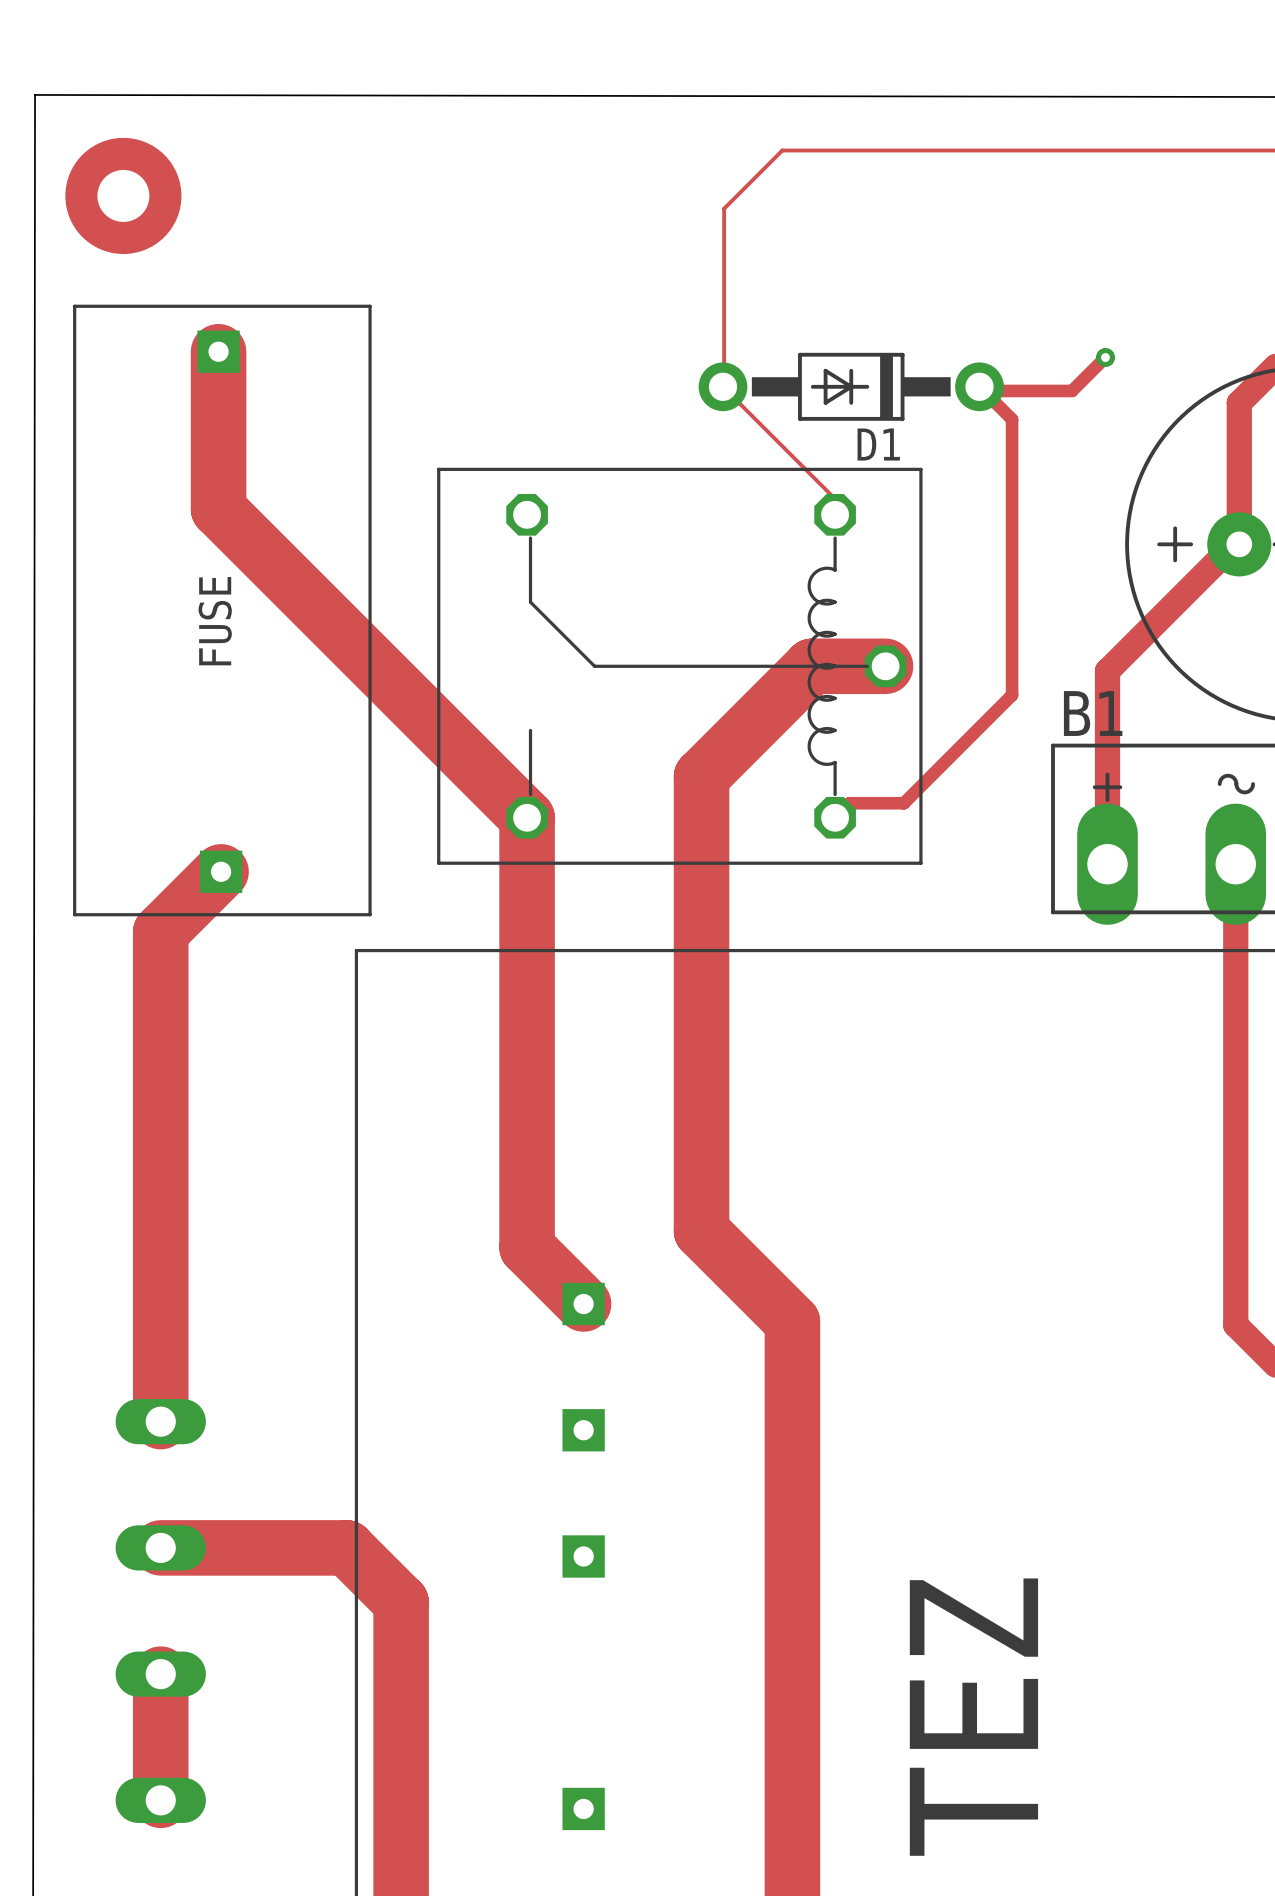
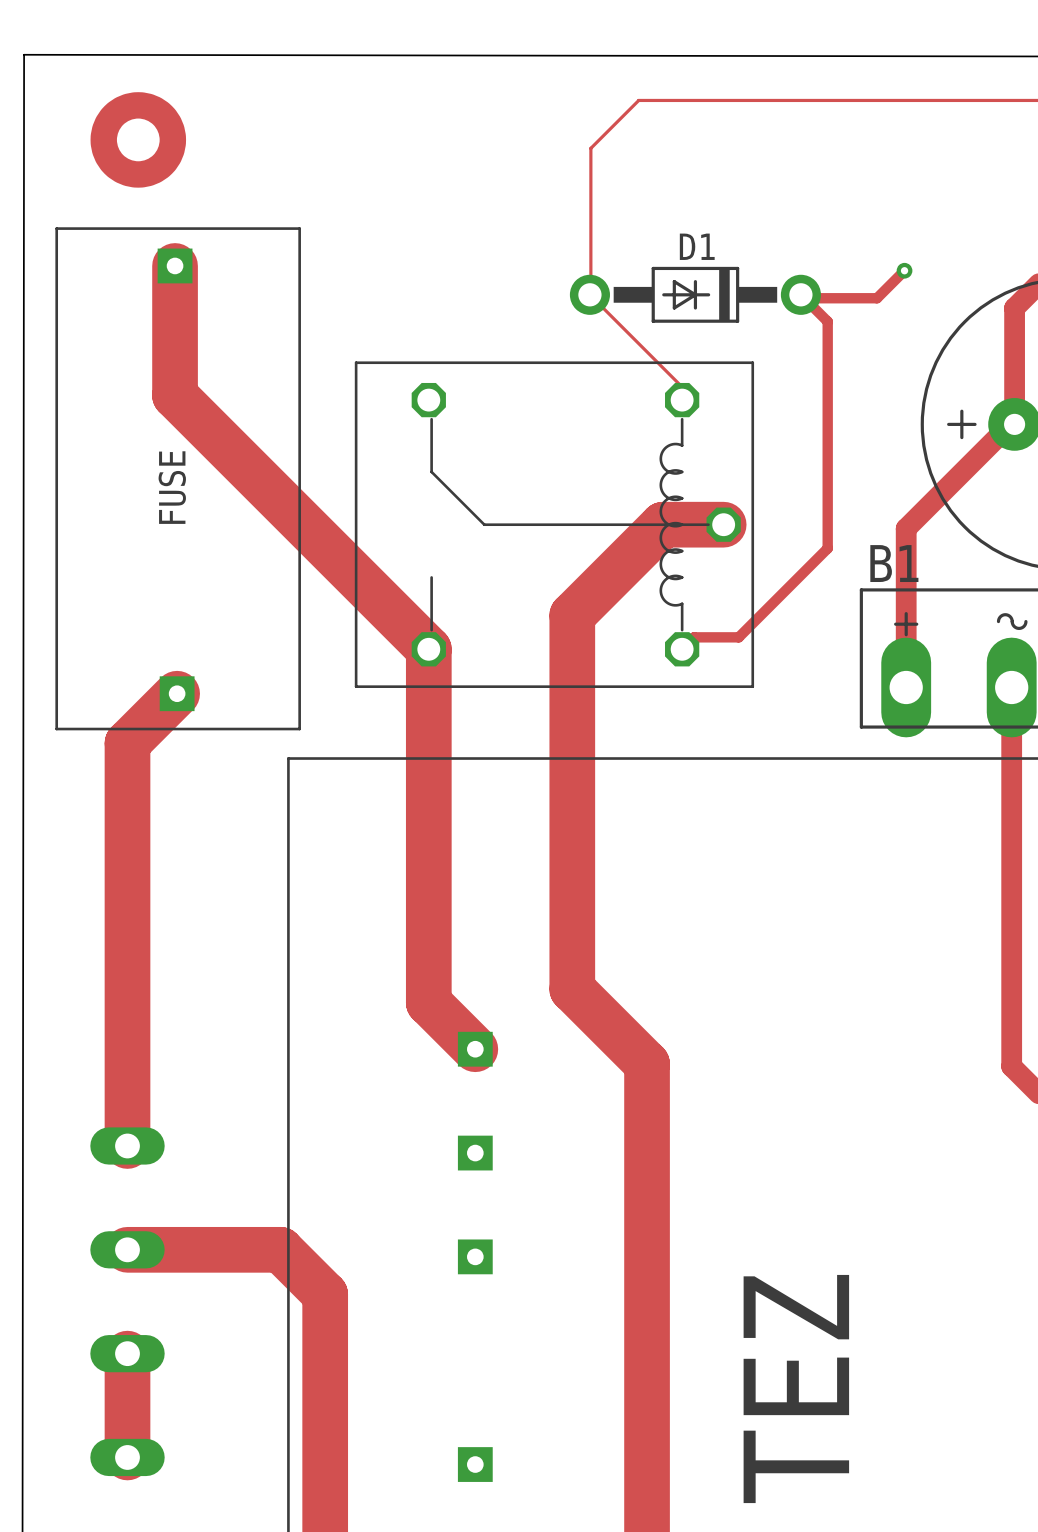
drawing position: (123, 195) -> (138, 139)
D1 name position: D1 (878, 444) -> D1 (697, 246)

